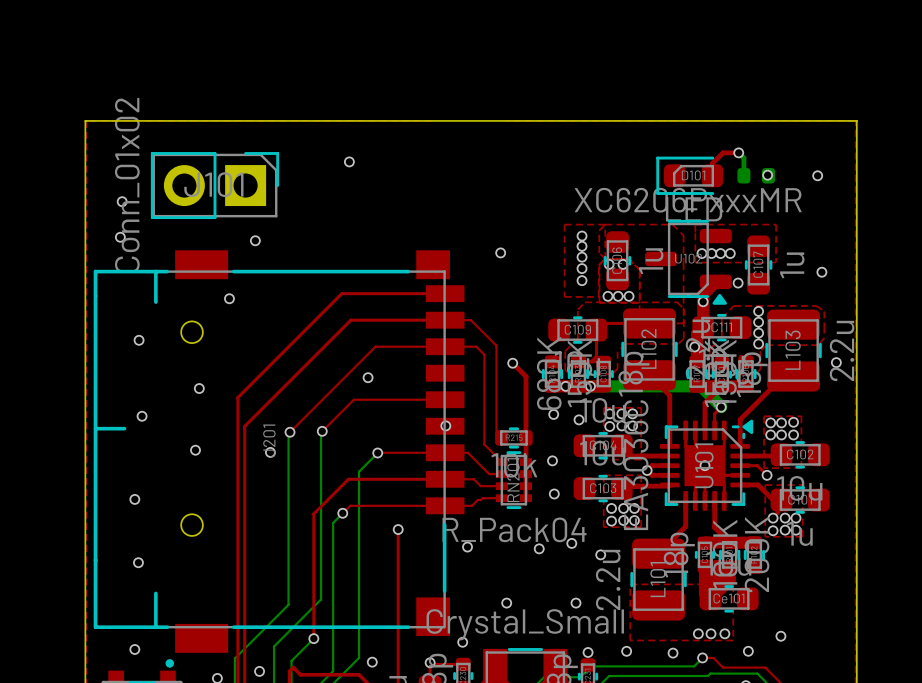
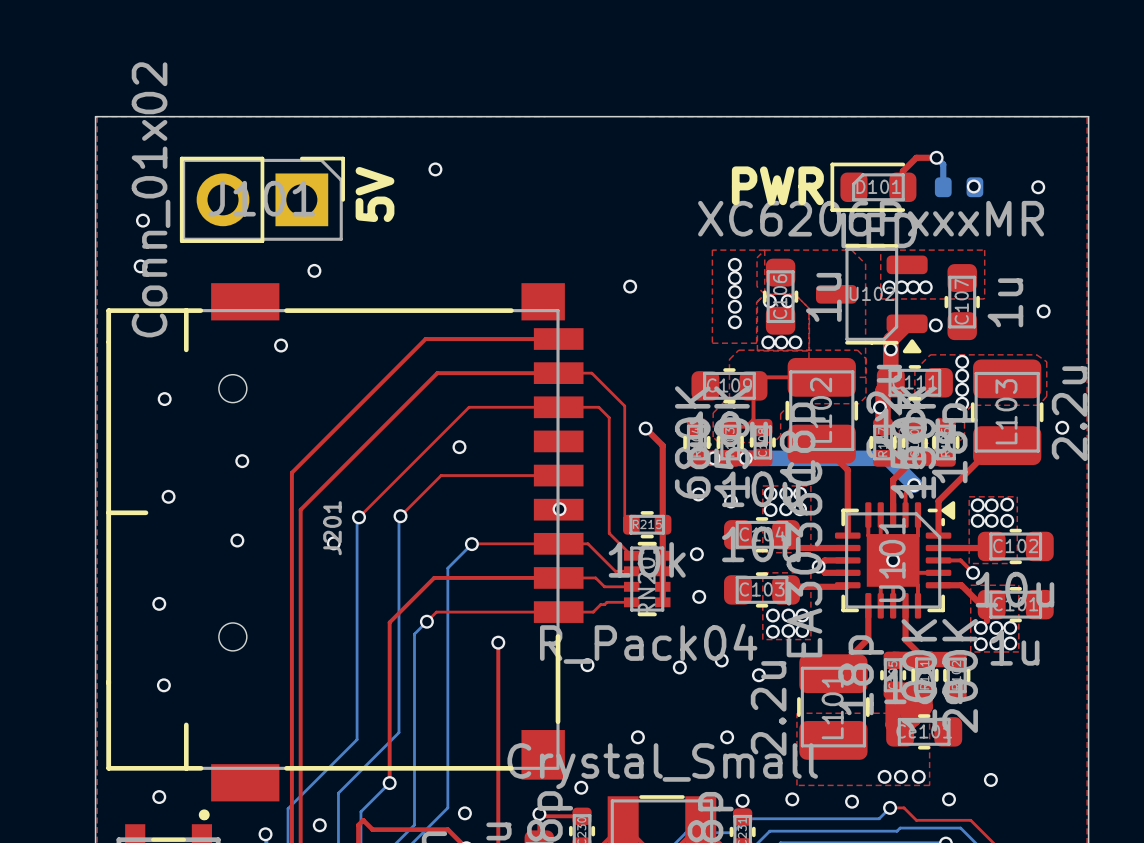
text: none -> PWR (777, 185)
text: none -> 5V (375, 194)

